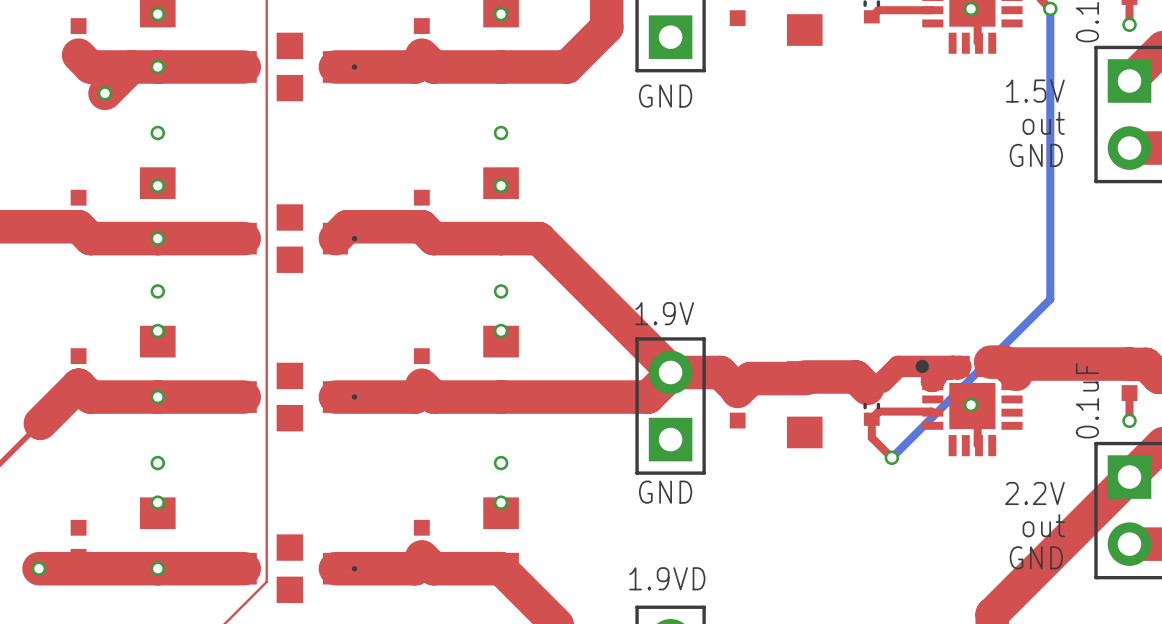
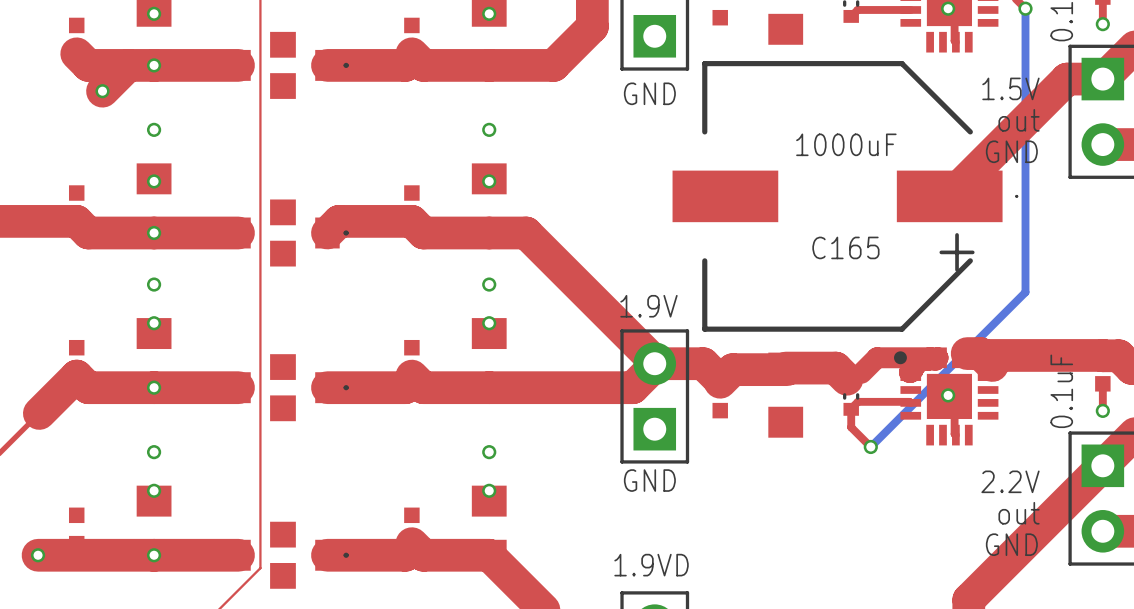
top track: none -> (1102, 79) (1067, 79) (949, 196)
C165: none -> 1000uF (845, 196)
text: none -> + (957, 252)

